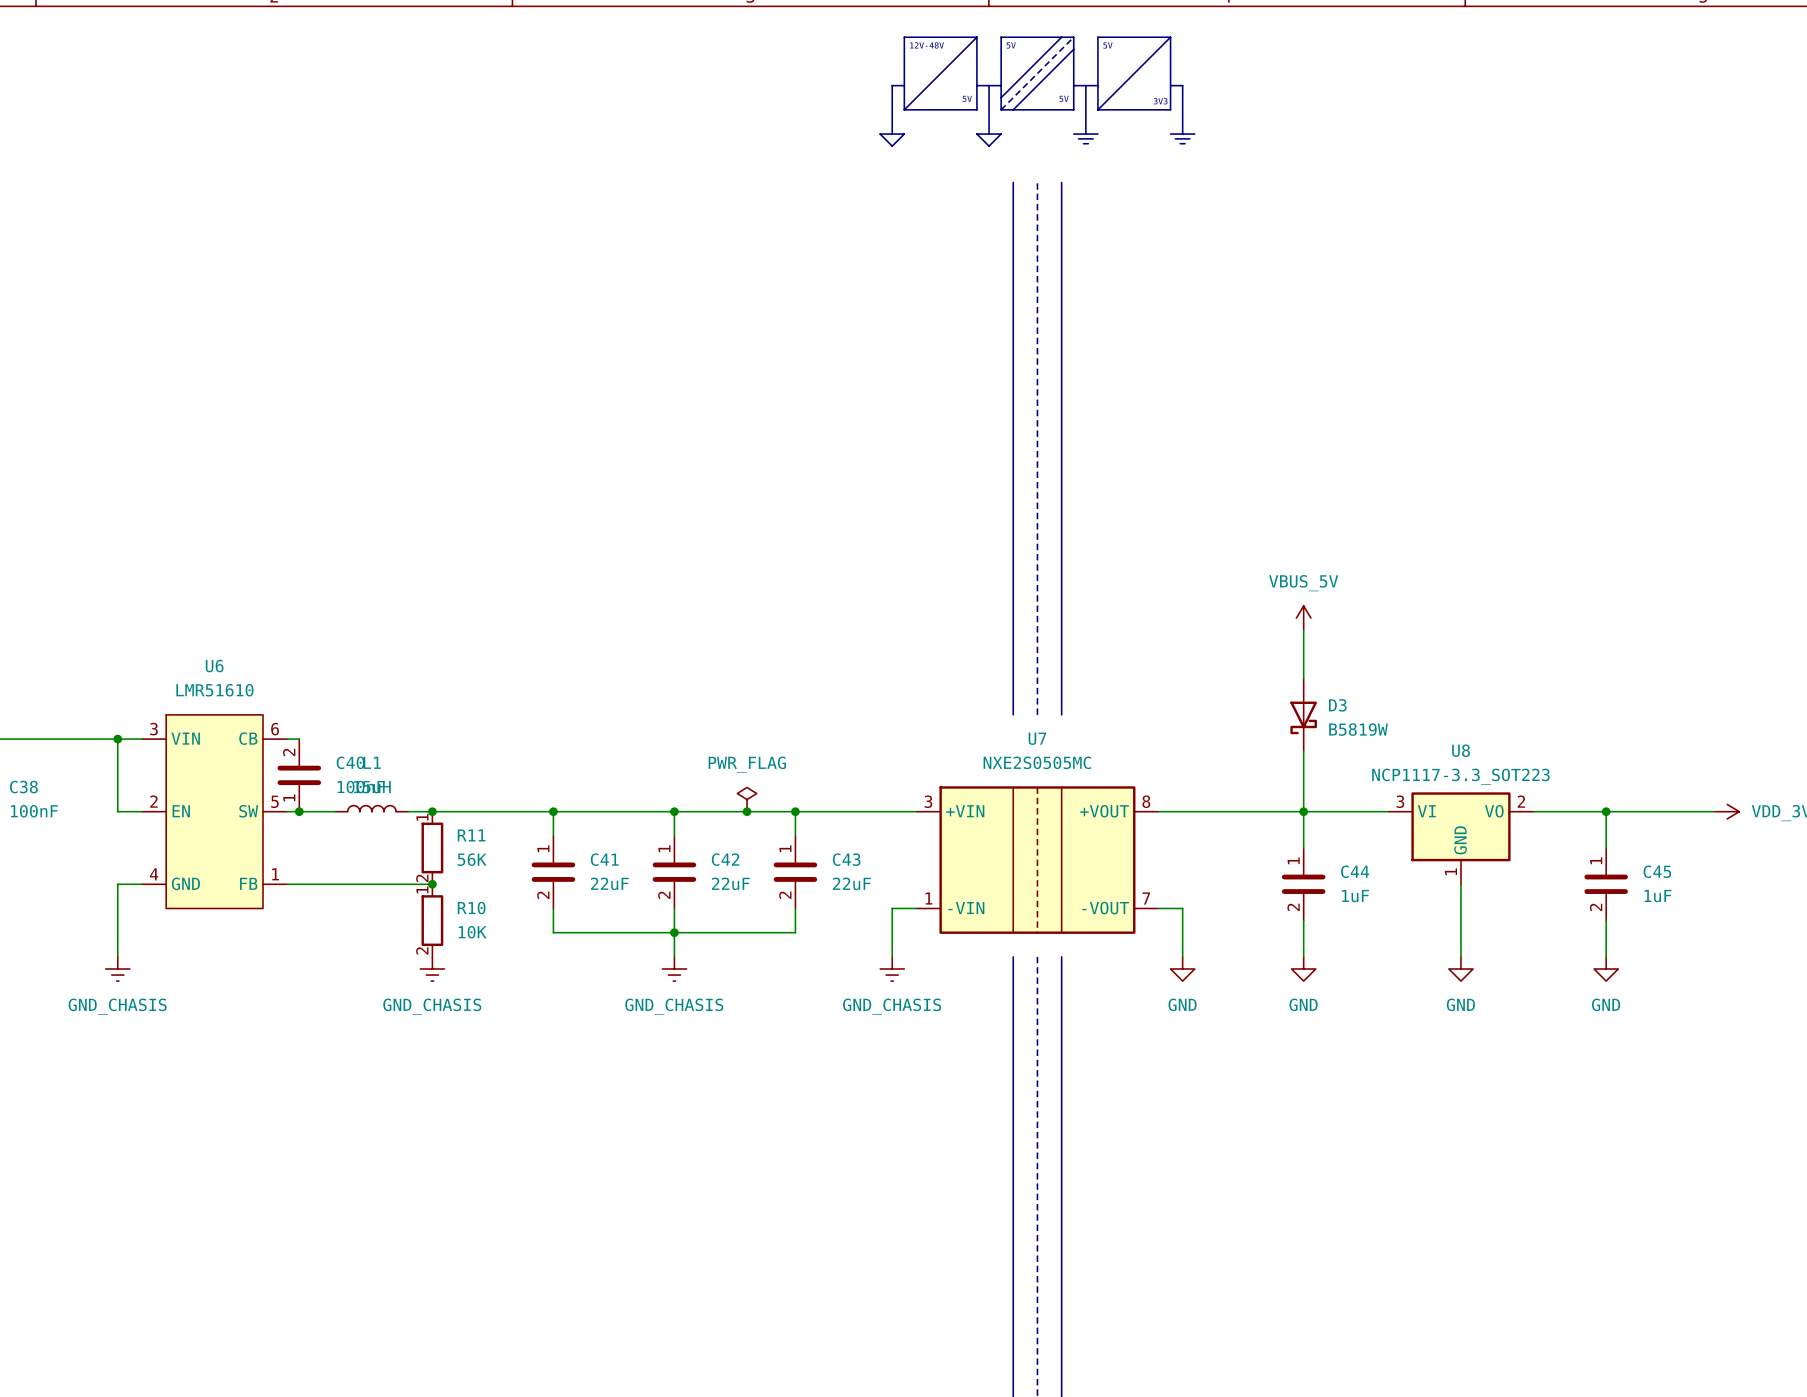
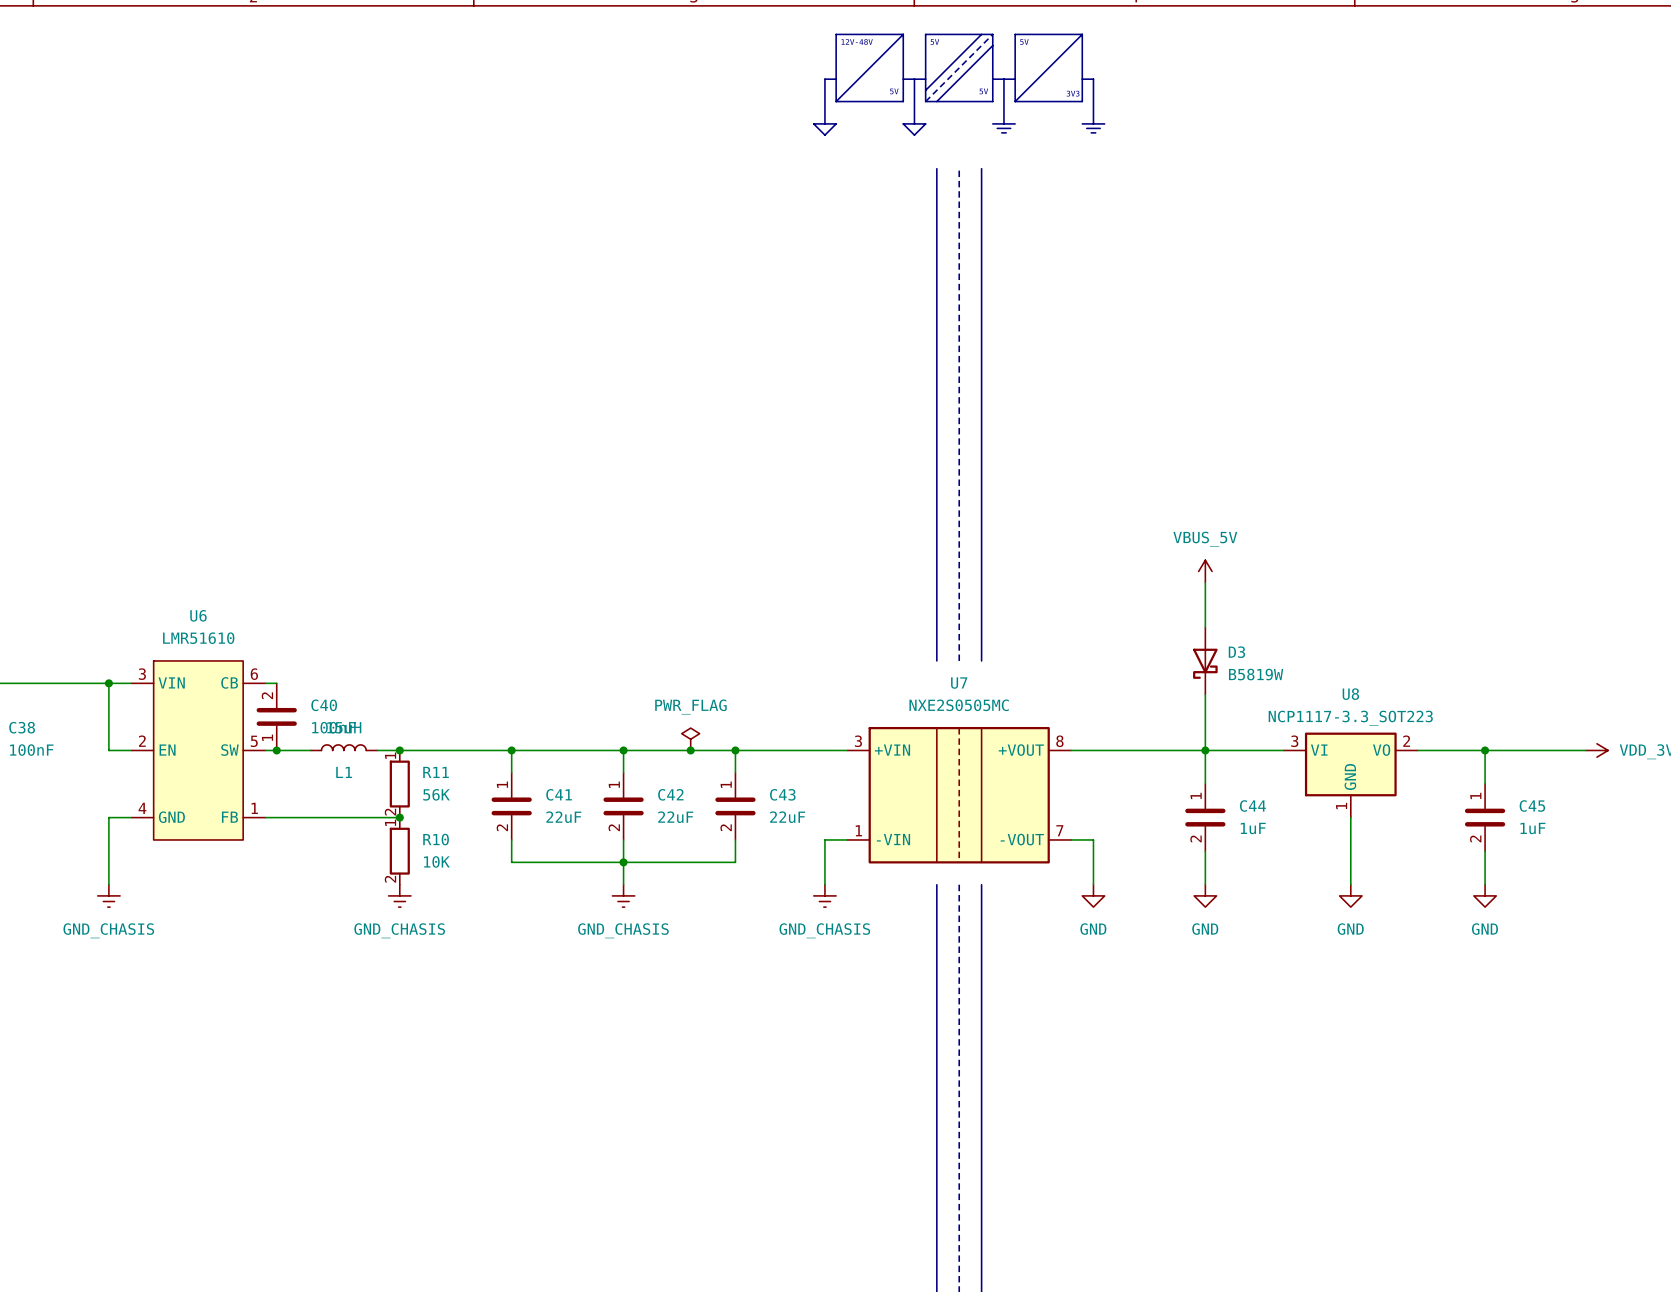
L1 name position: L1 (372, 762) -> L1 (344, 772)

